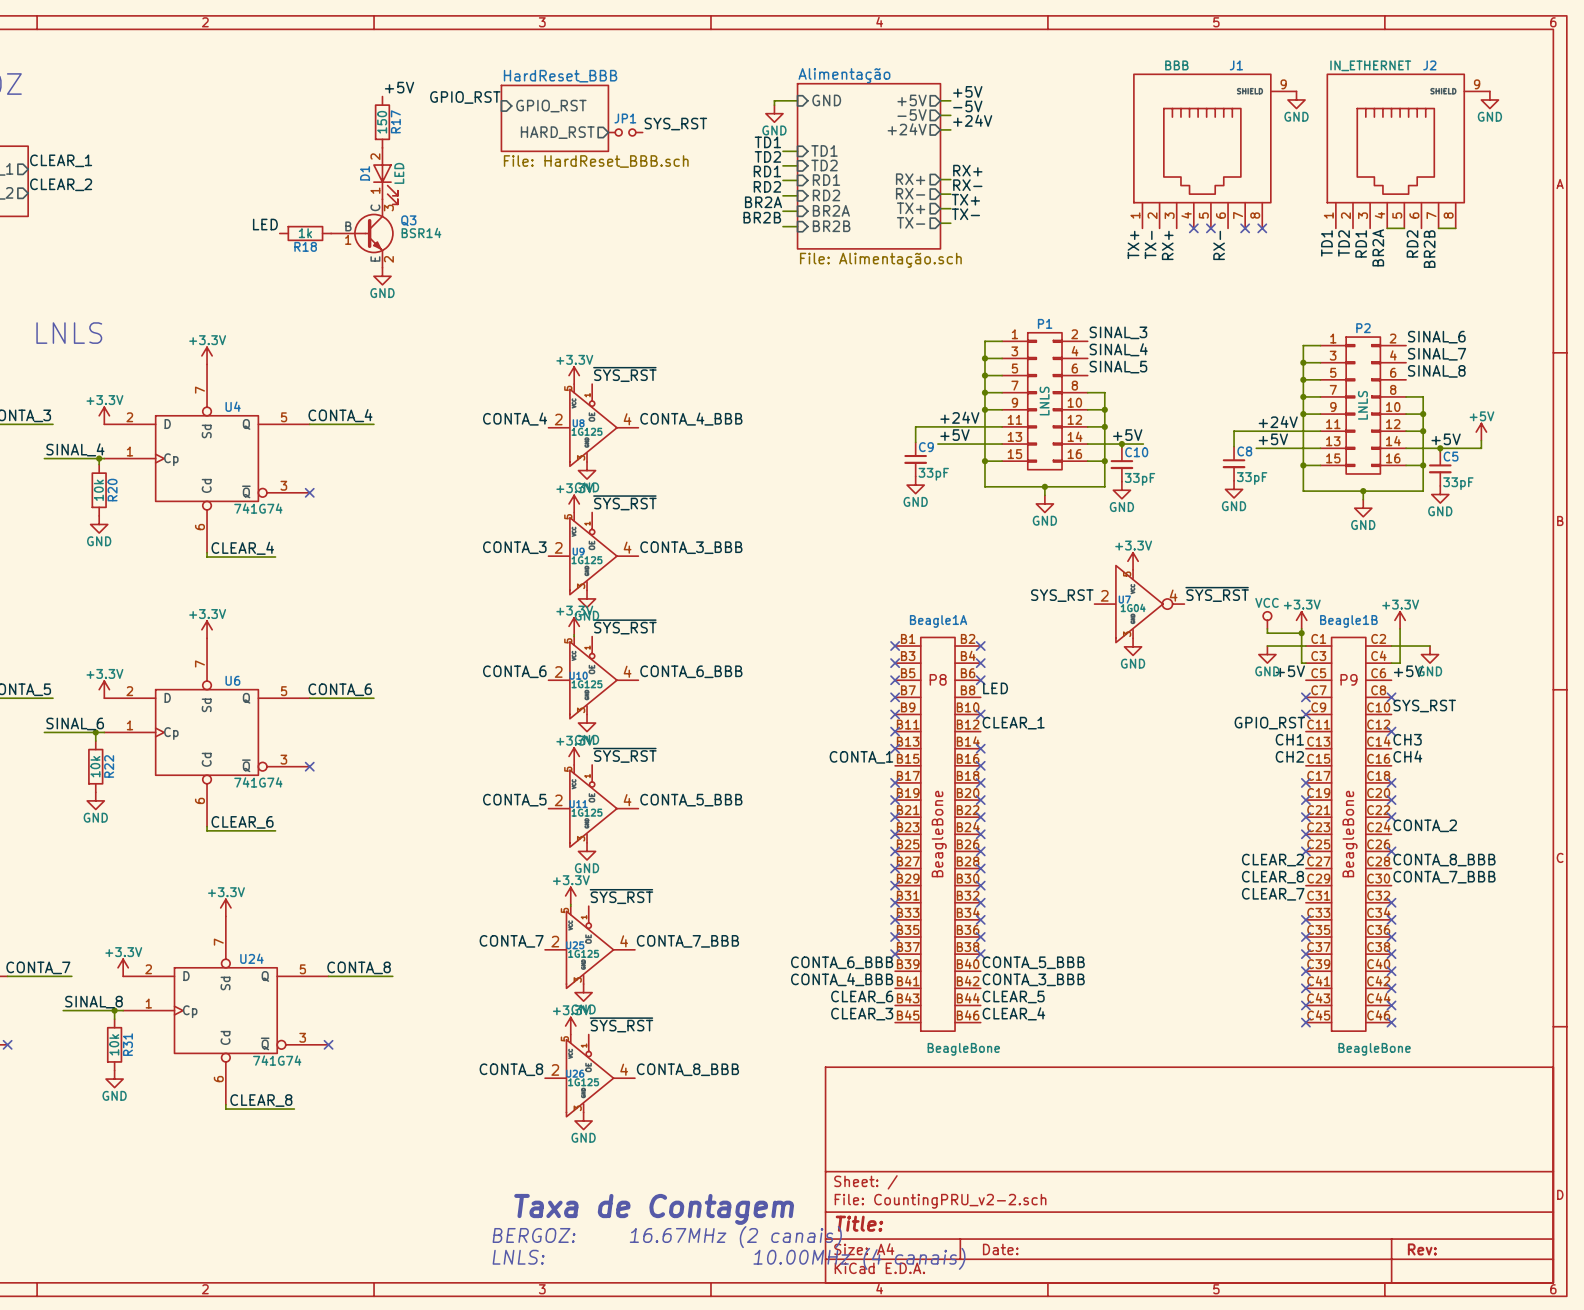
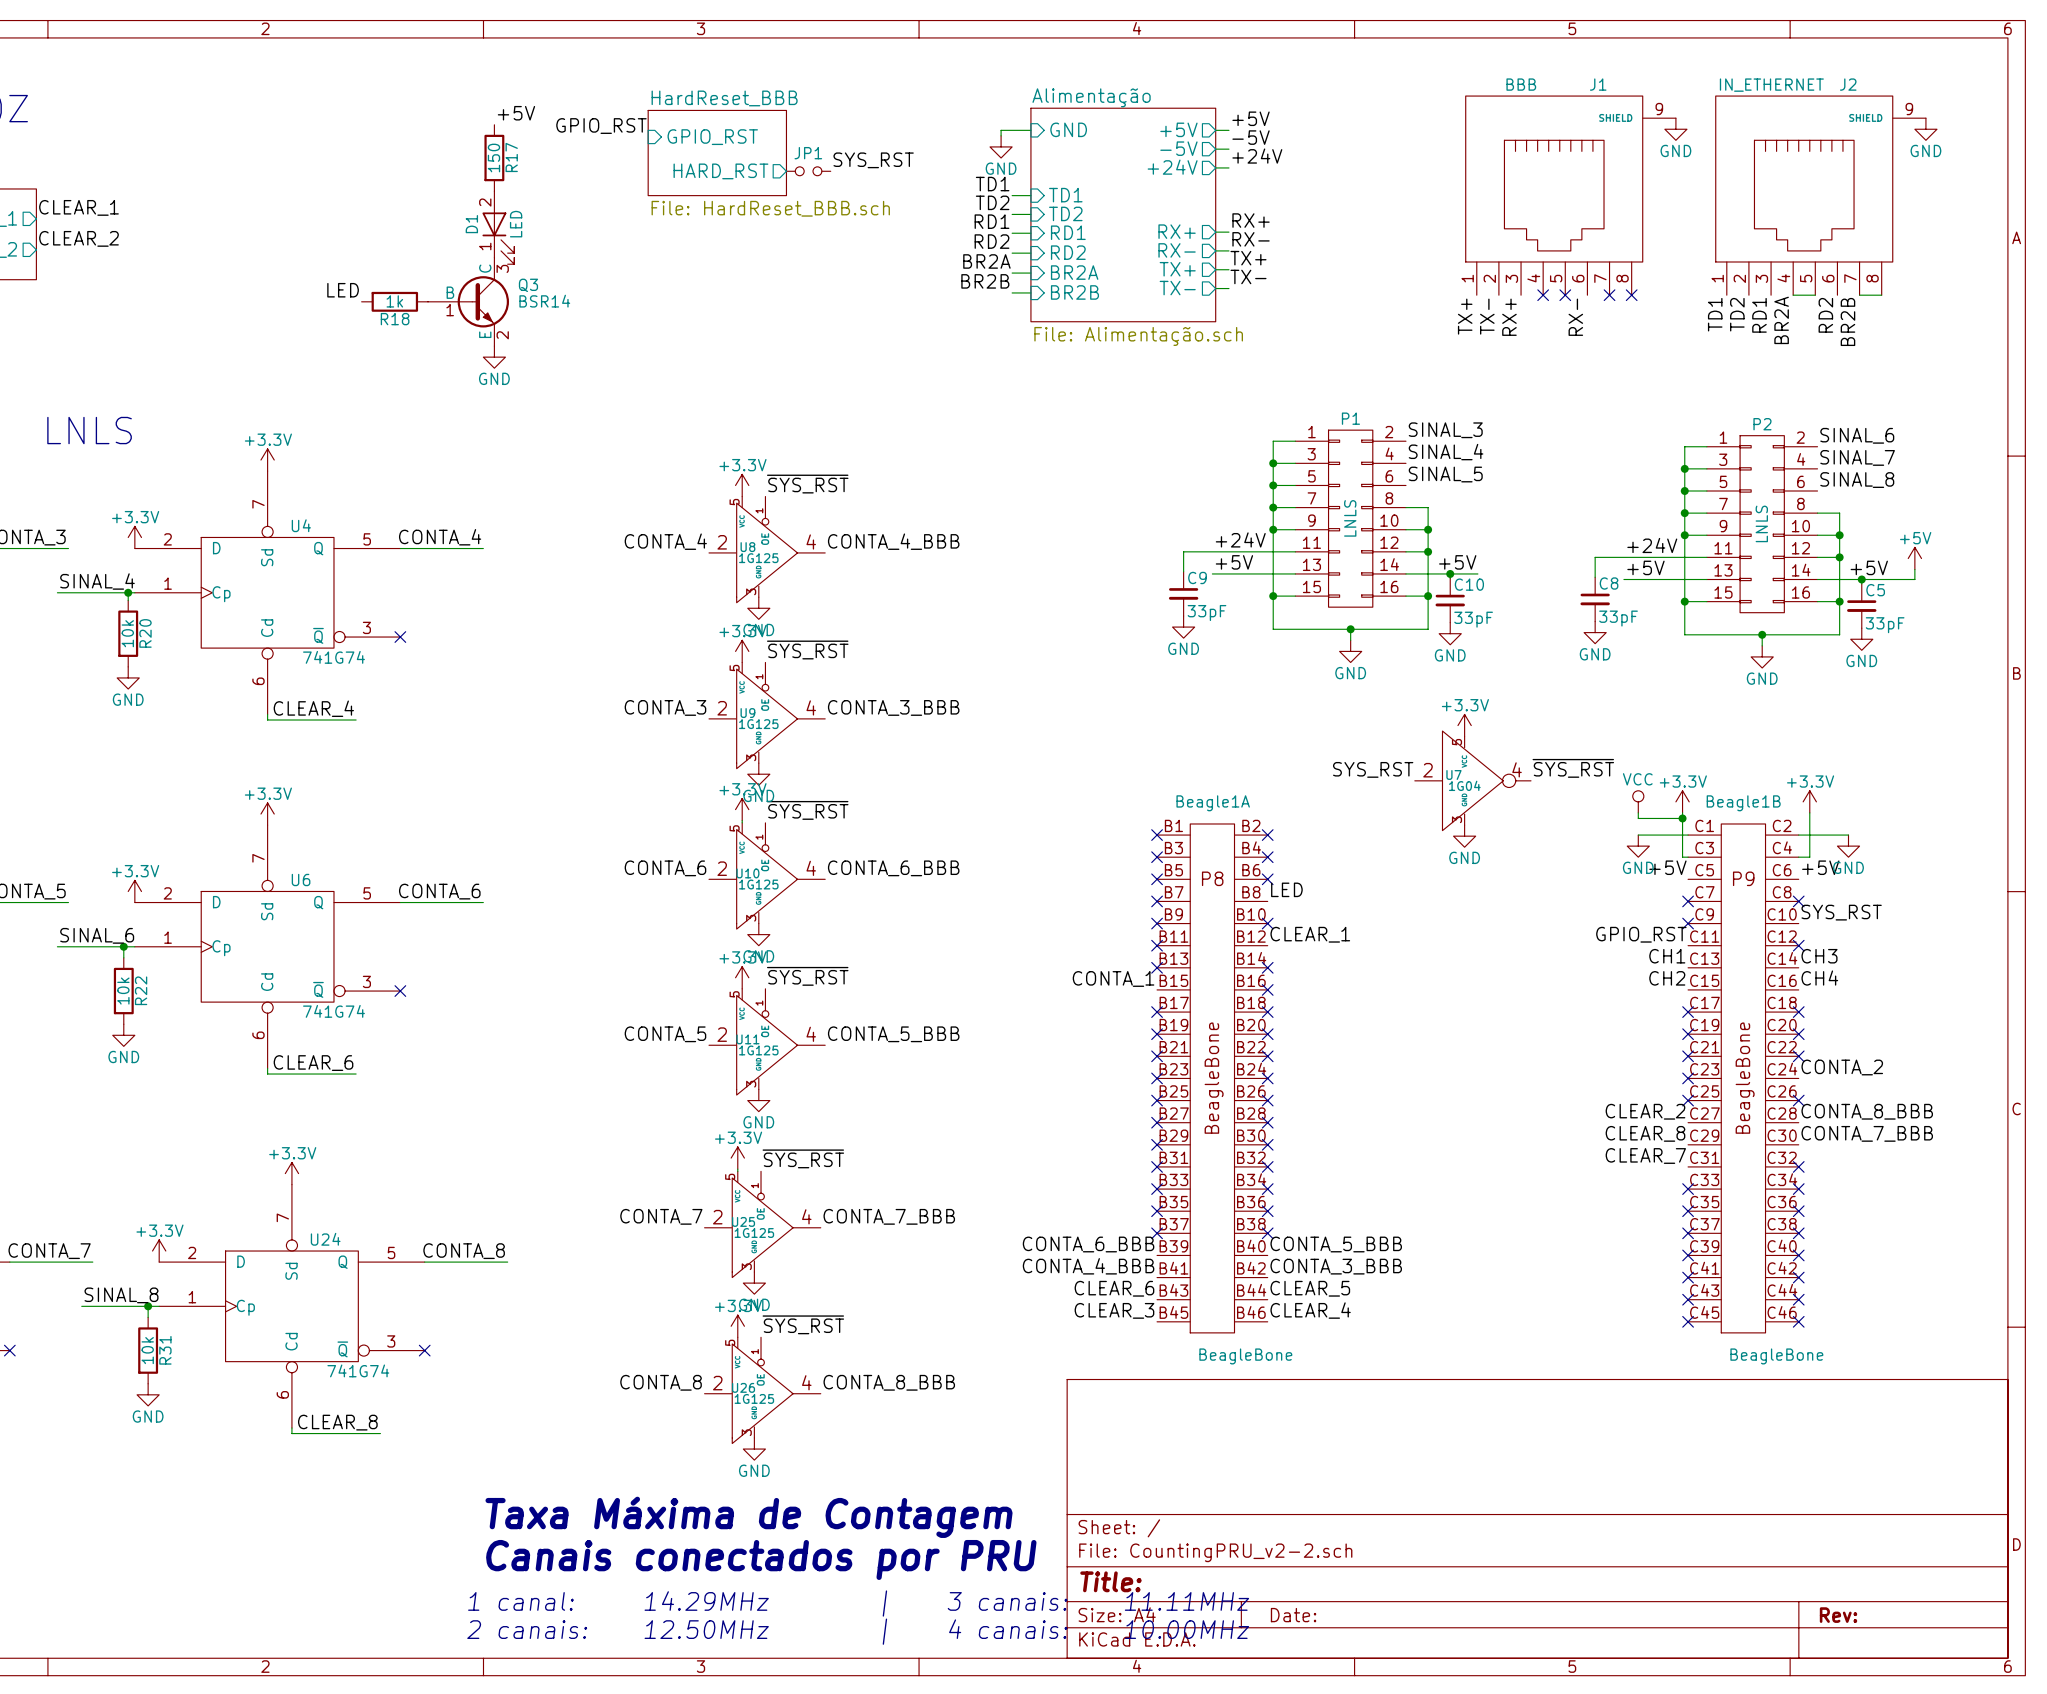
text: none -> Canais conectados por PRU (761, 1559)
text: Taxa de Contagem (654, 1209) -> Taxa Máxima de Contagem (749, 1517)
text: BERGOZ: 16.67MHz (2 canais) (667, 1237) -> none
text: none -> 1 canal: 14.29MHz | 3 canais: 11.11MHz (858, 1603)
text: LNLS: 10.00MHz (4 canais) (729, 1258) -> none
text: none -> 2 canais: 12.50MHz | 4 canais: 10.00MHz (858, 1631)

